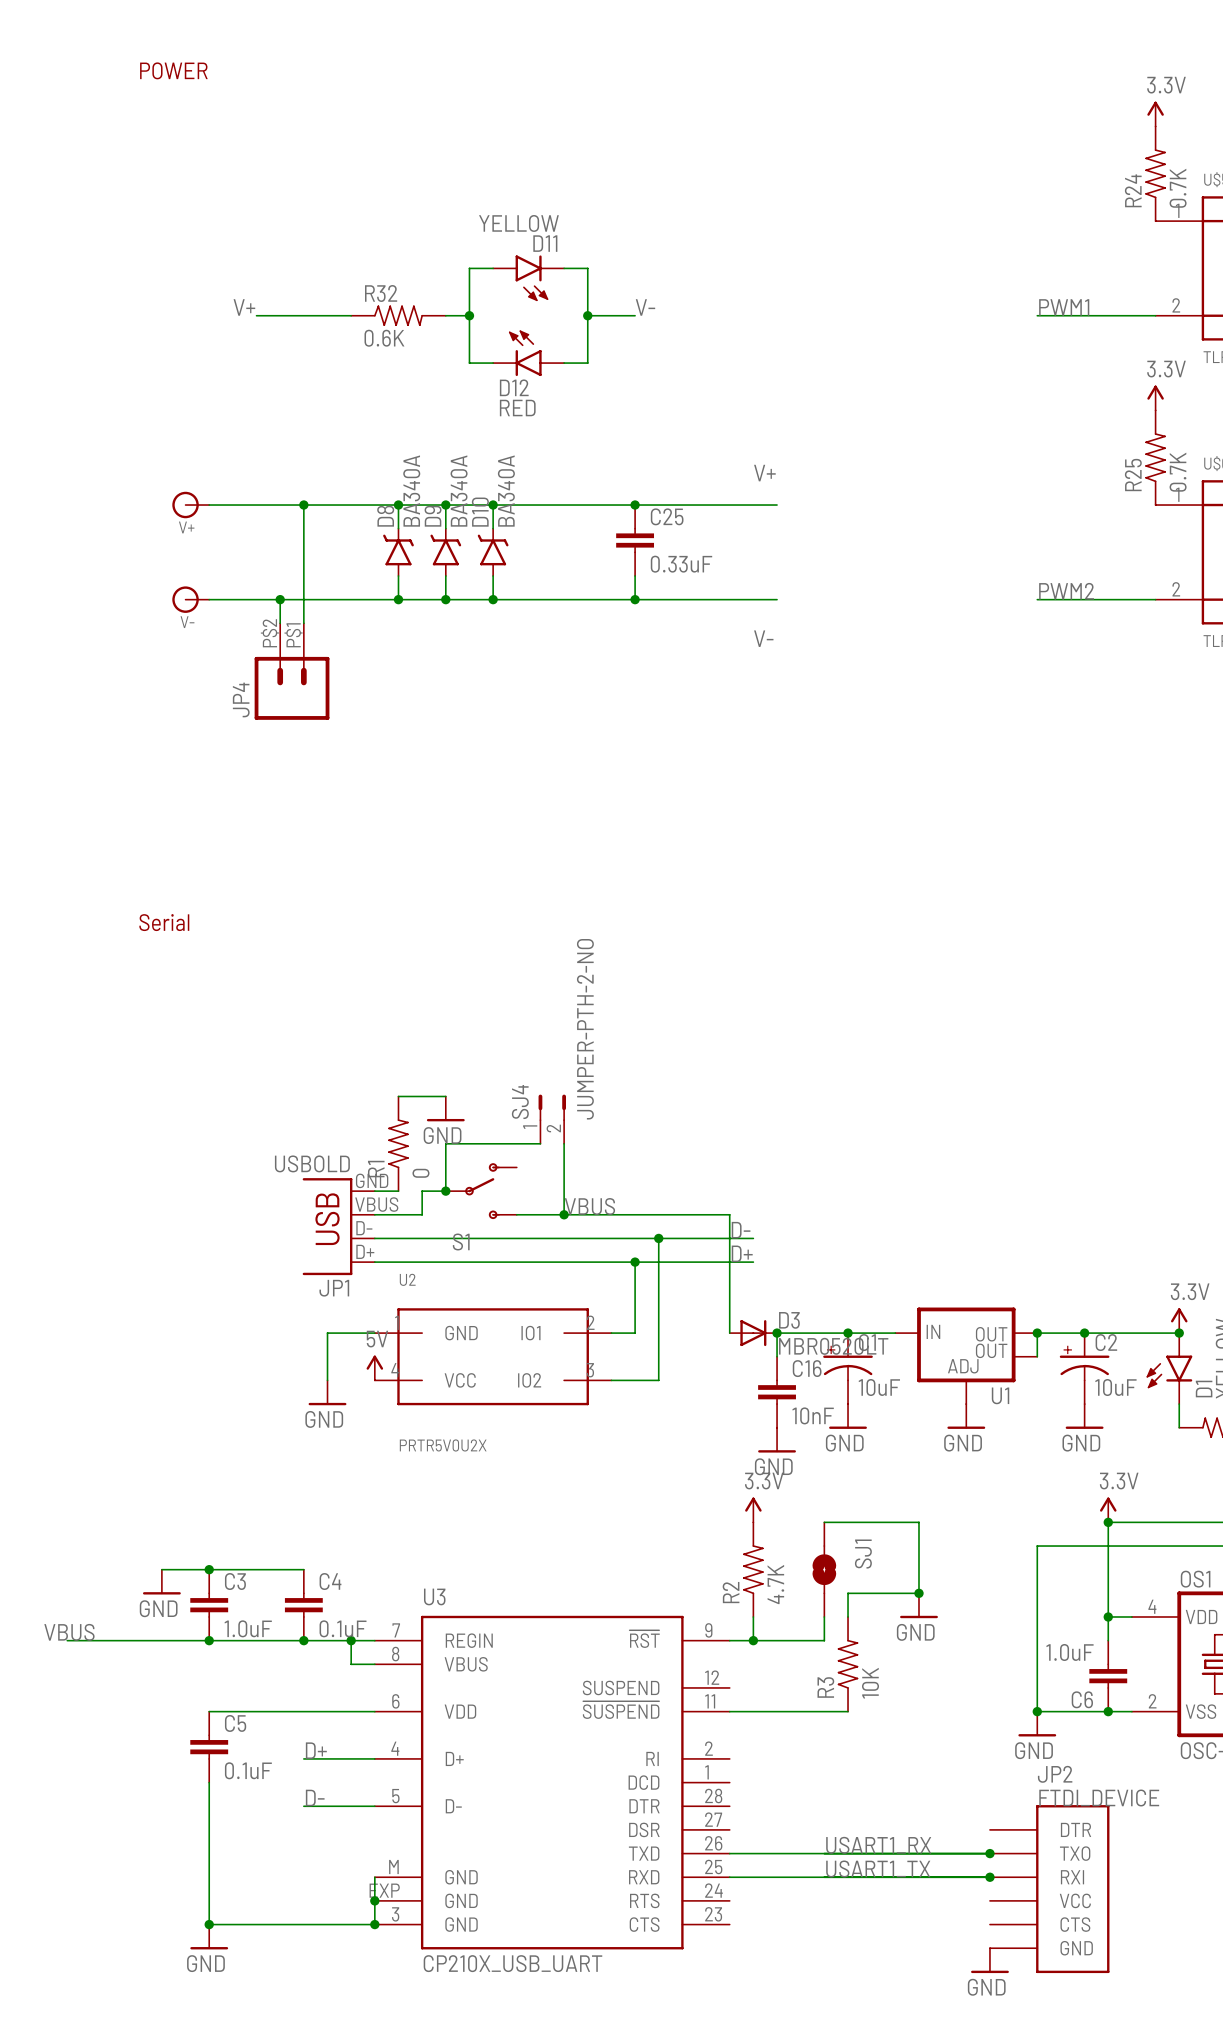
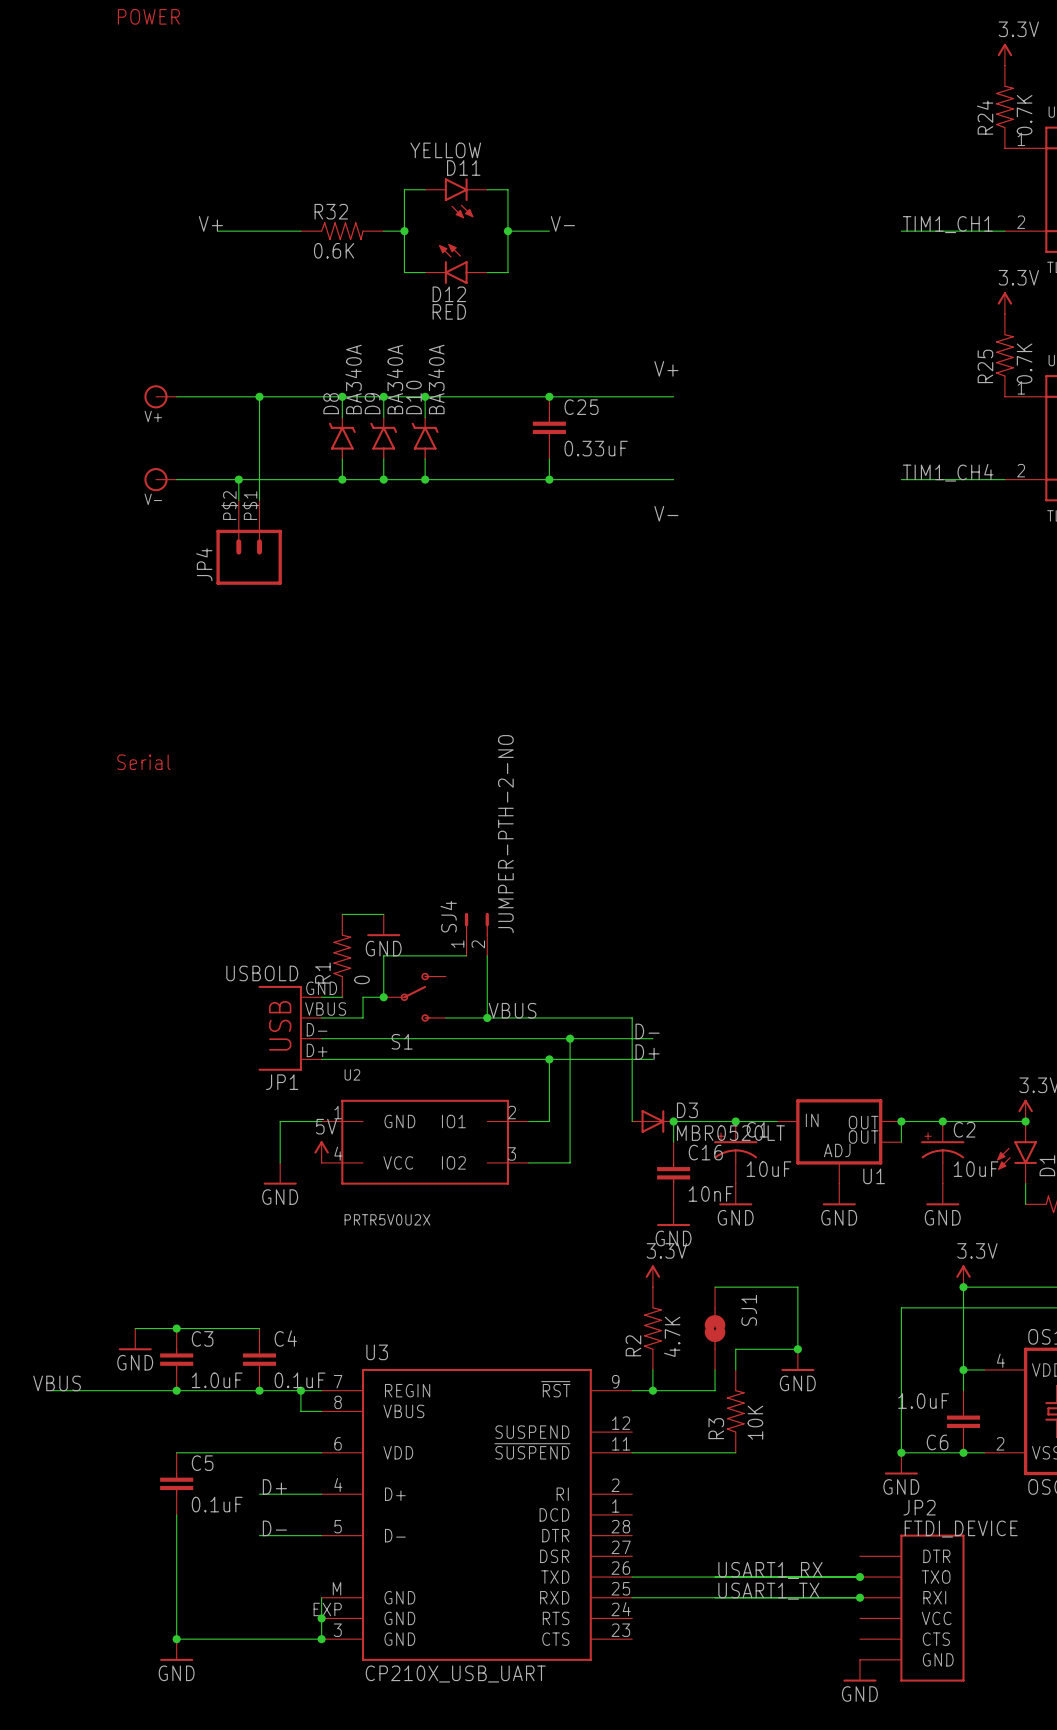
label: PWM1 (1064, 307) -> TIM1_CH1 (947, 224)
label: PWM2 (1066, 591) -> TIM1_CH4 (948, 472)

